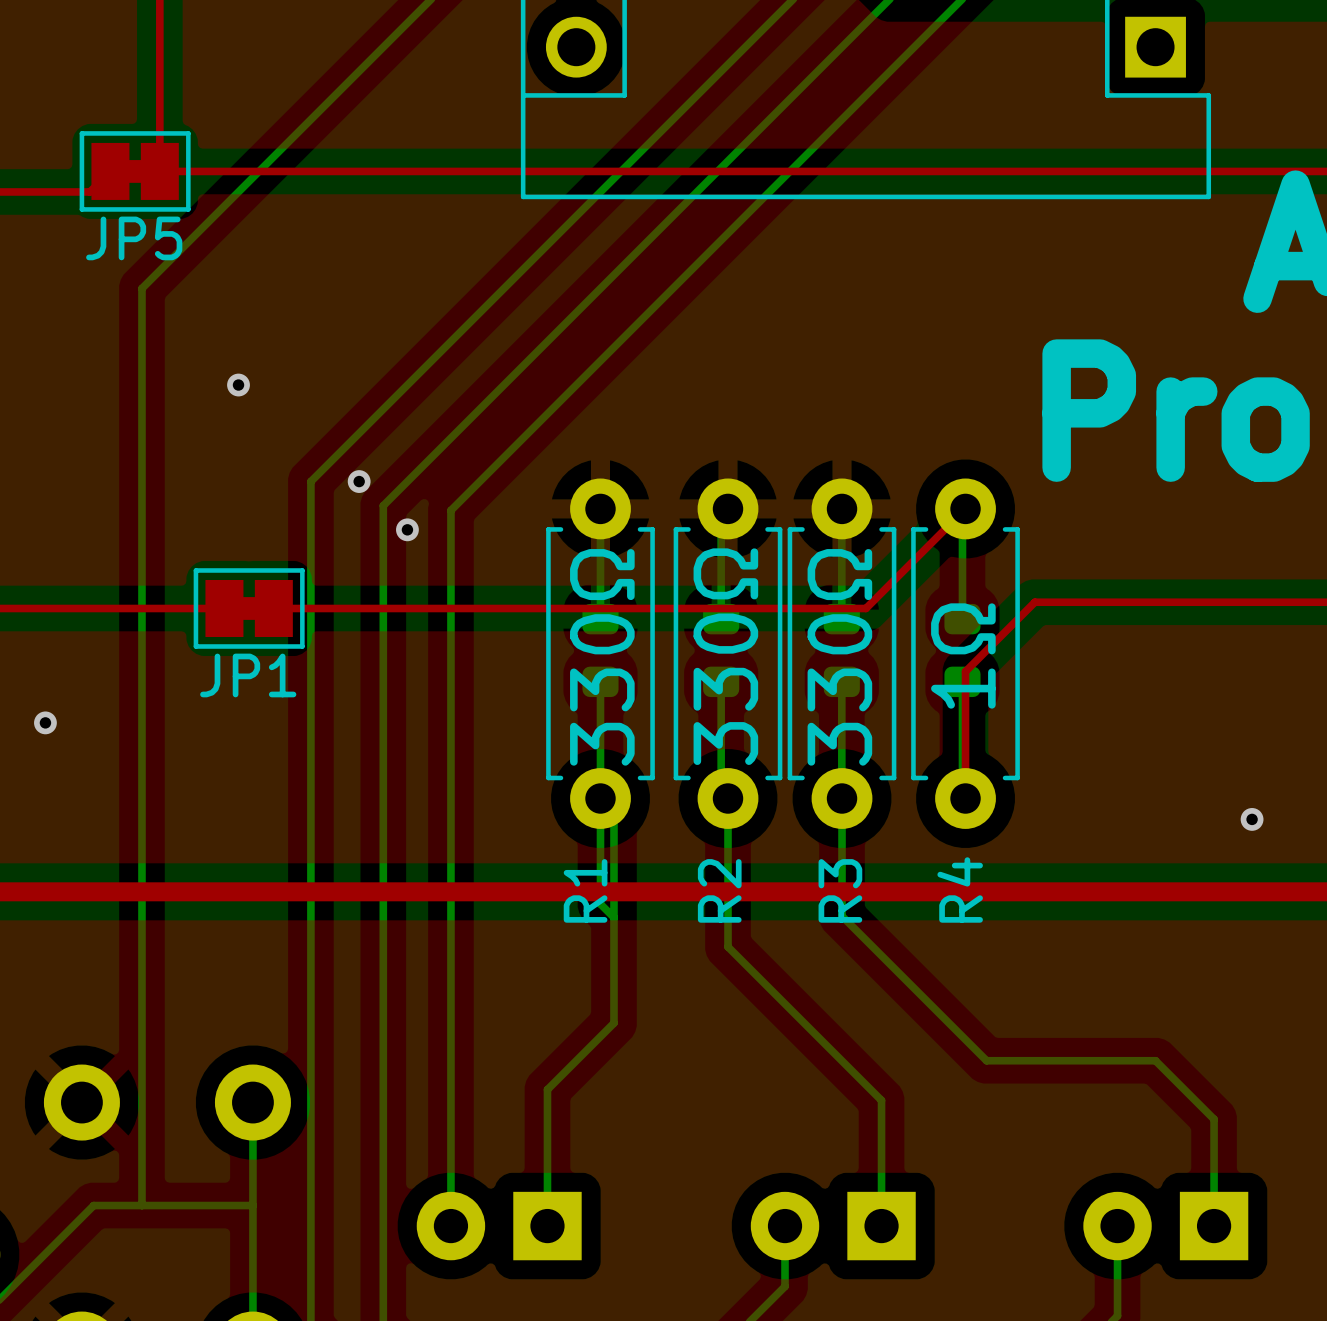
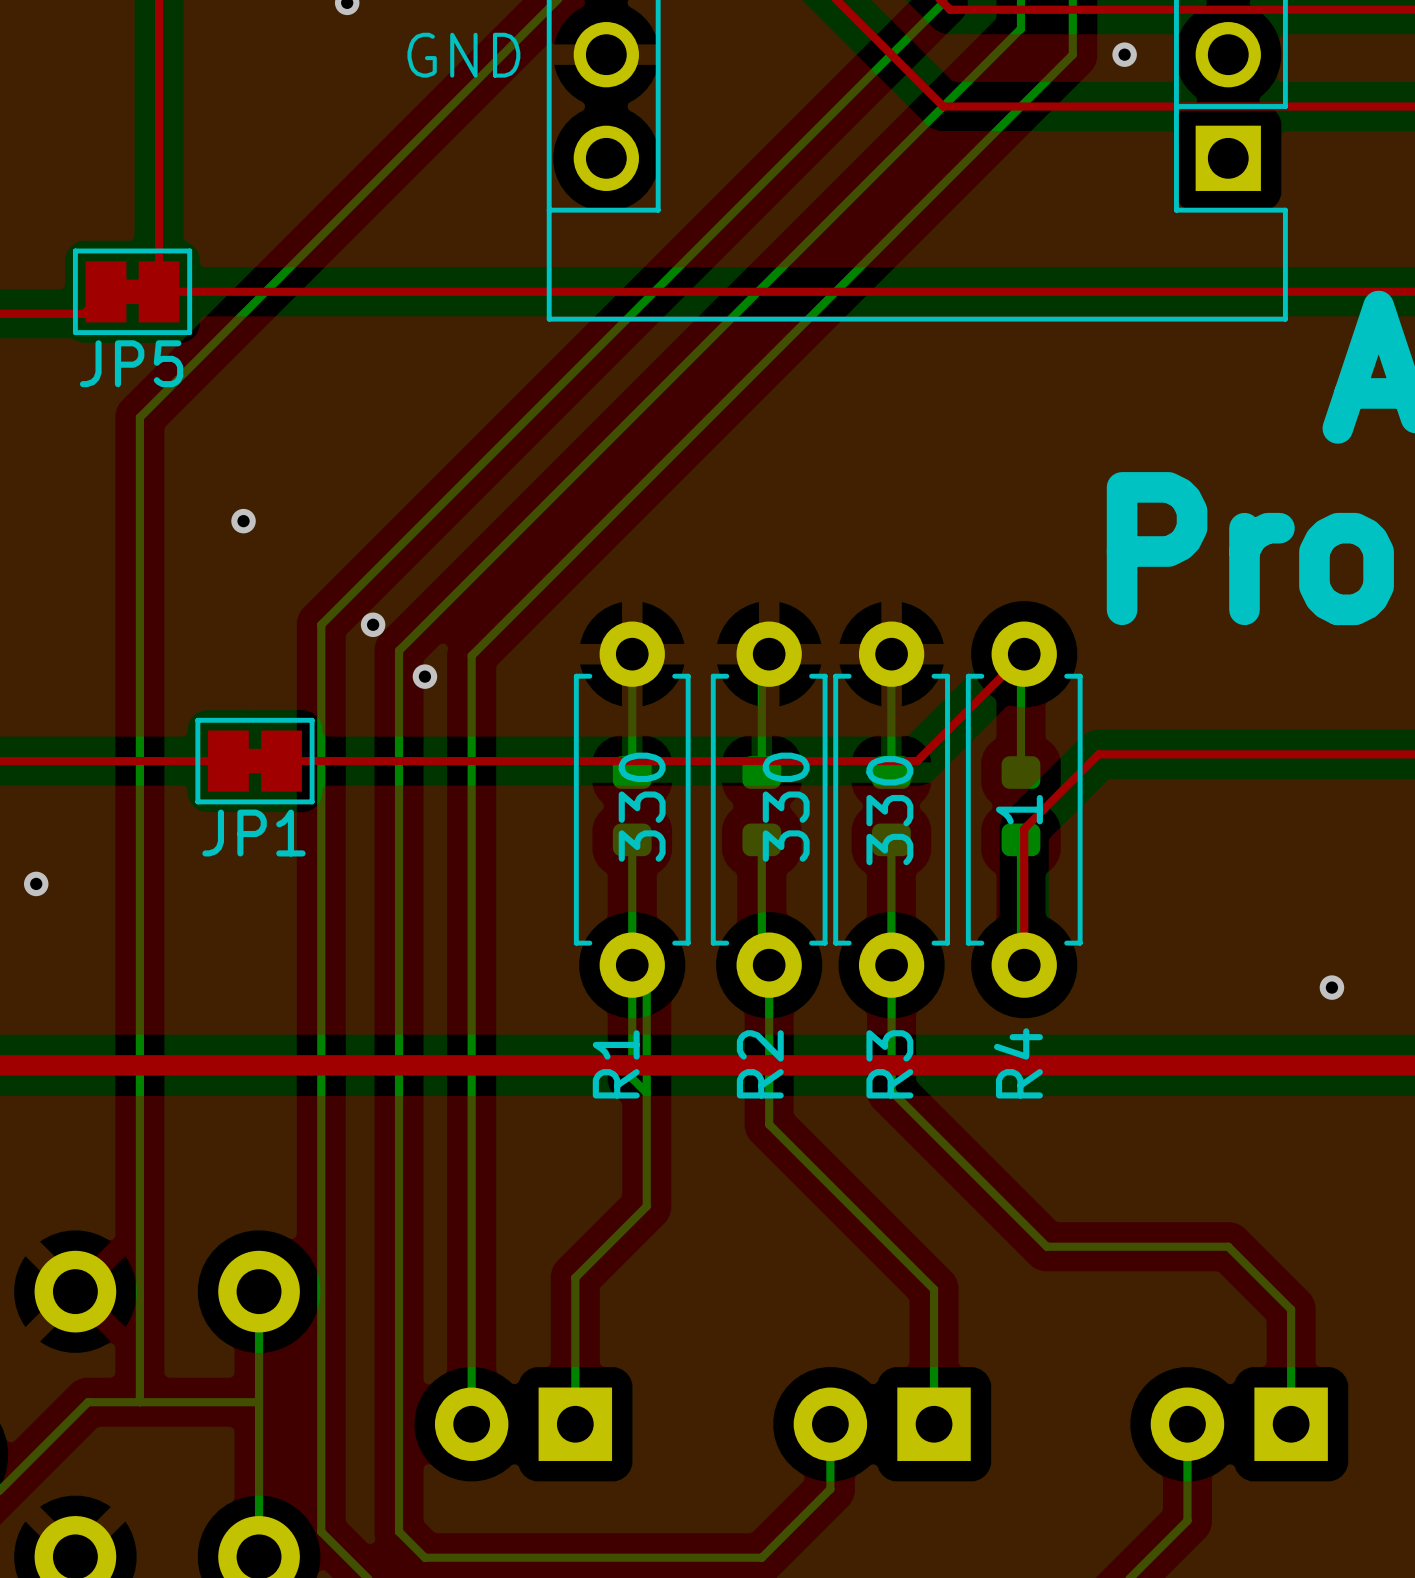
R4 value: 1Ω (963, 655) -> 1 (1019, 809)
R2 value: 330Ω (725, 656) -> 330 (786, 807)
R1 value: 330Ω (602, 657) -> 330 (642, 807)
R3 value: 330Ω (839, 657) -> 330 (889, 810)

